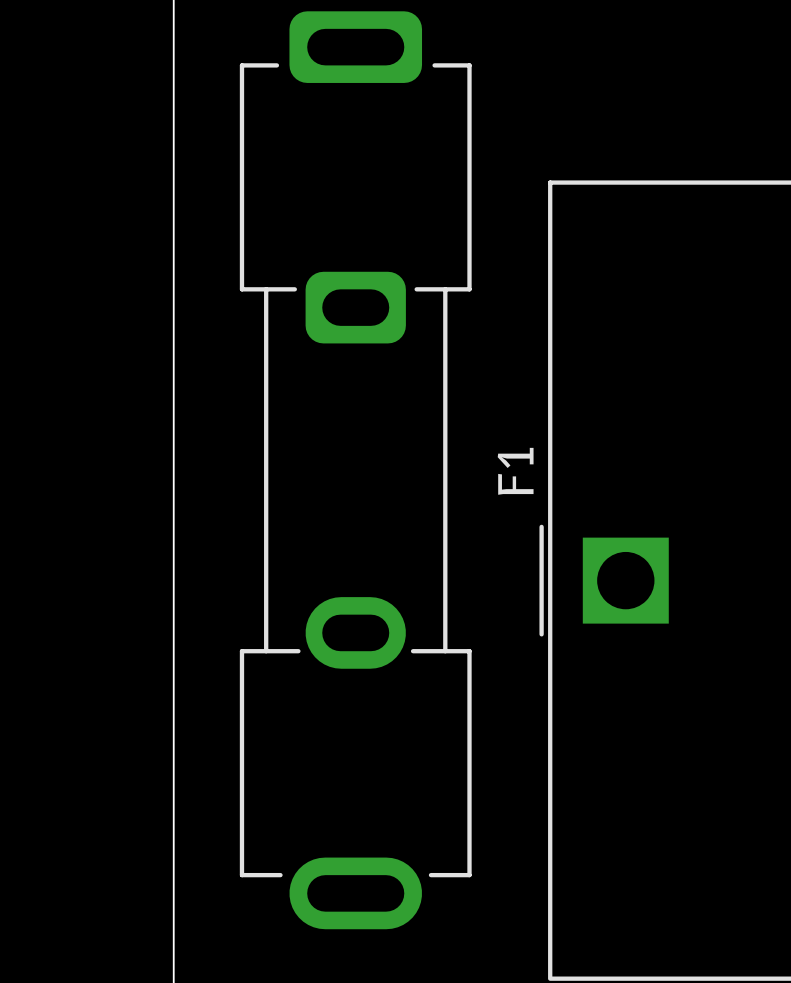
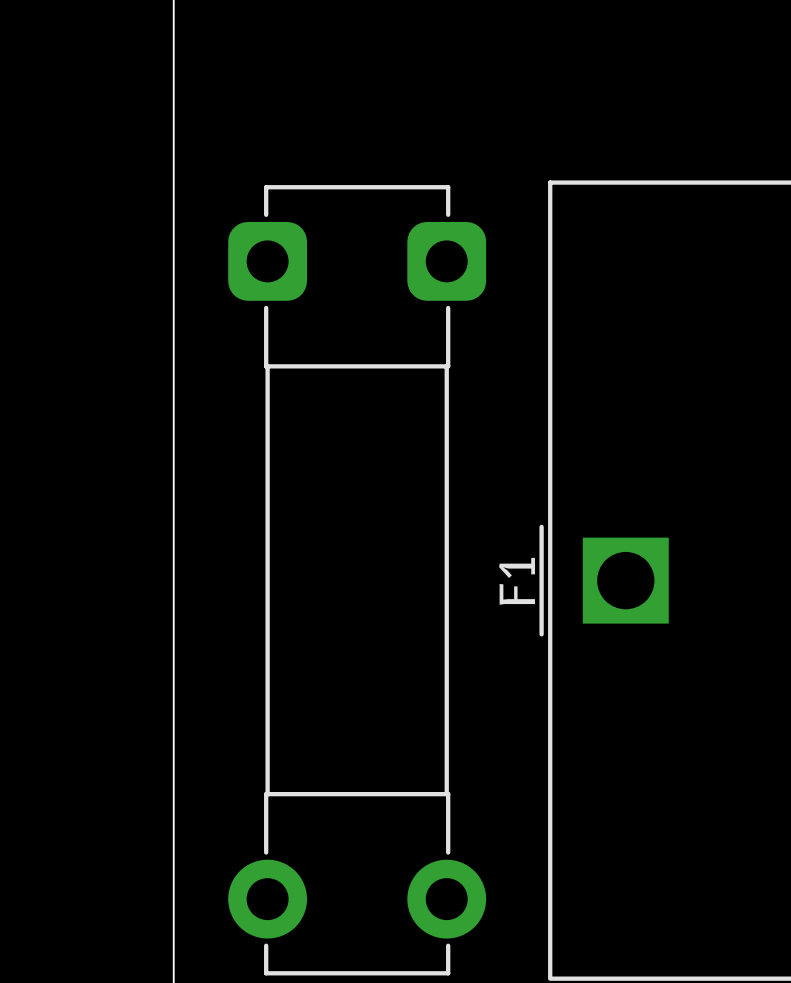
F1 footprint: [239, 11, 472, 930] -> [228, 185, 487, 976]

